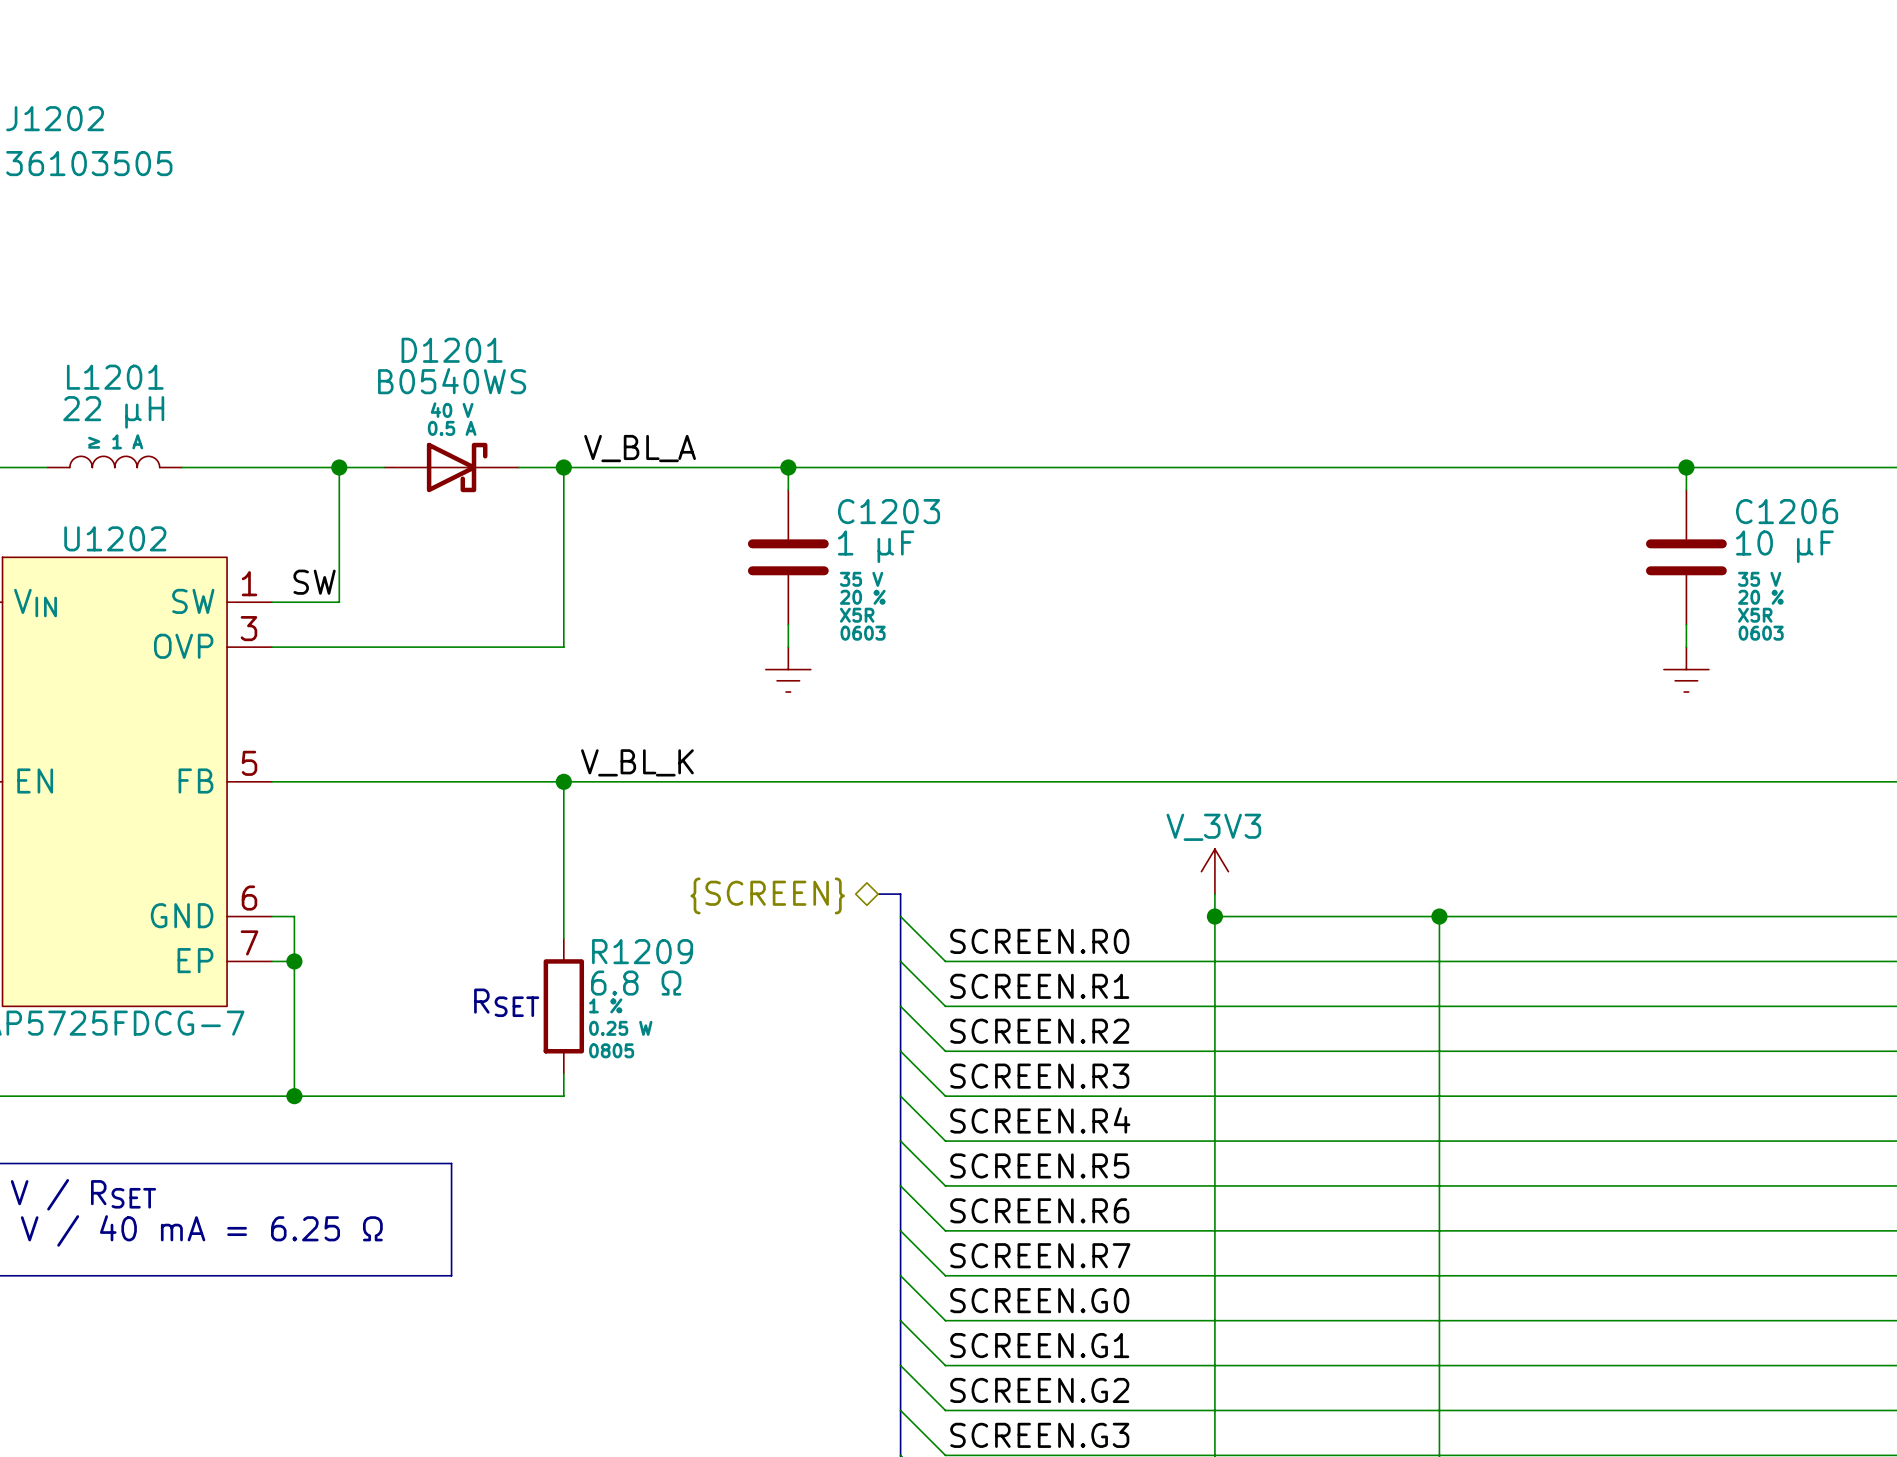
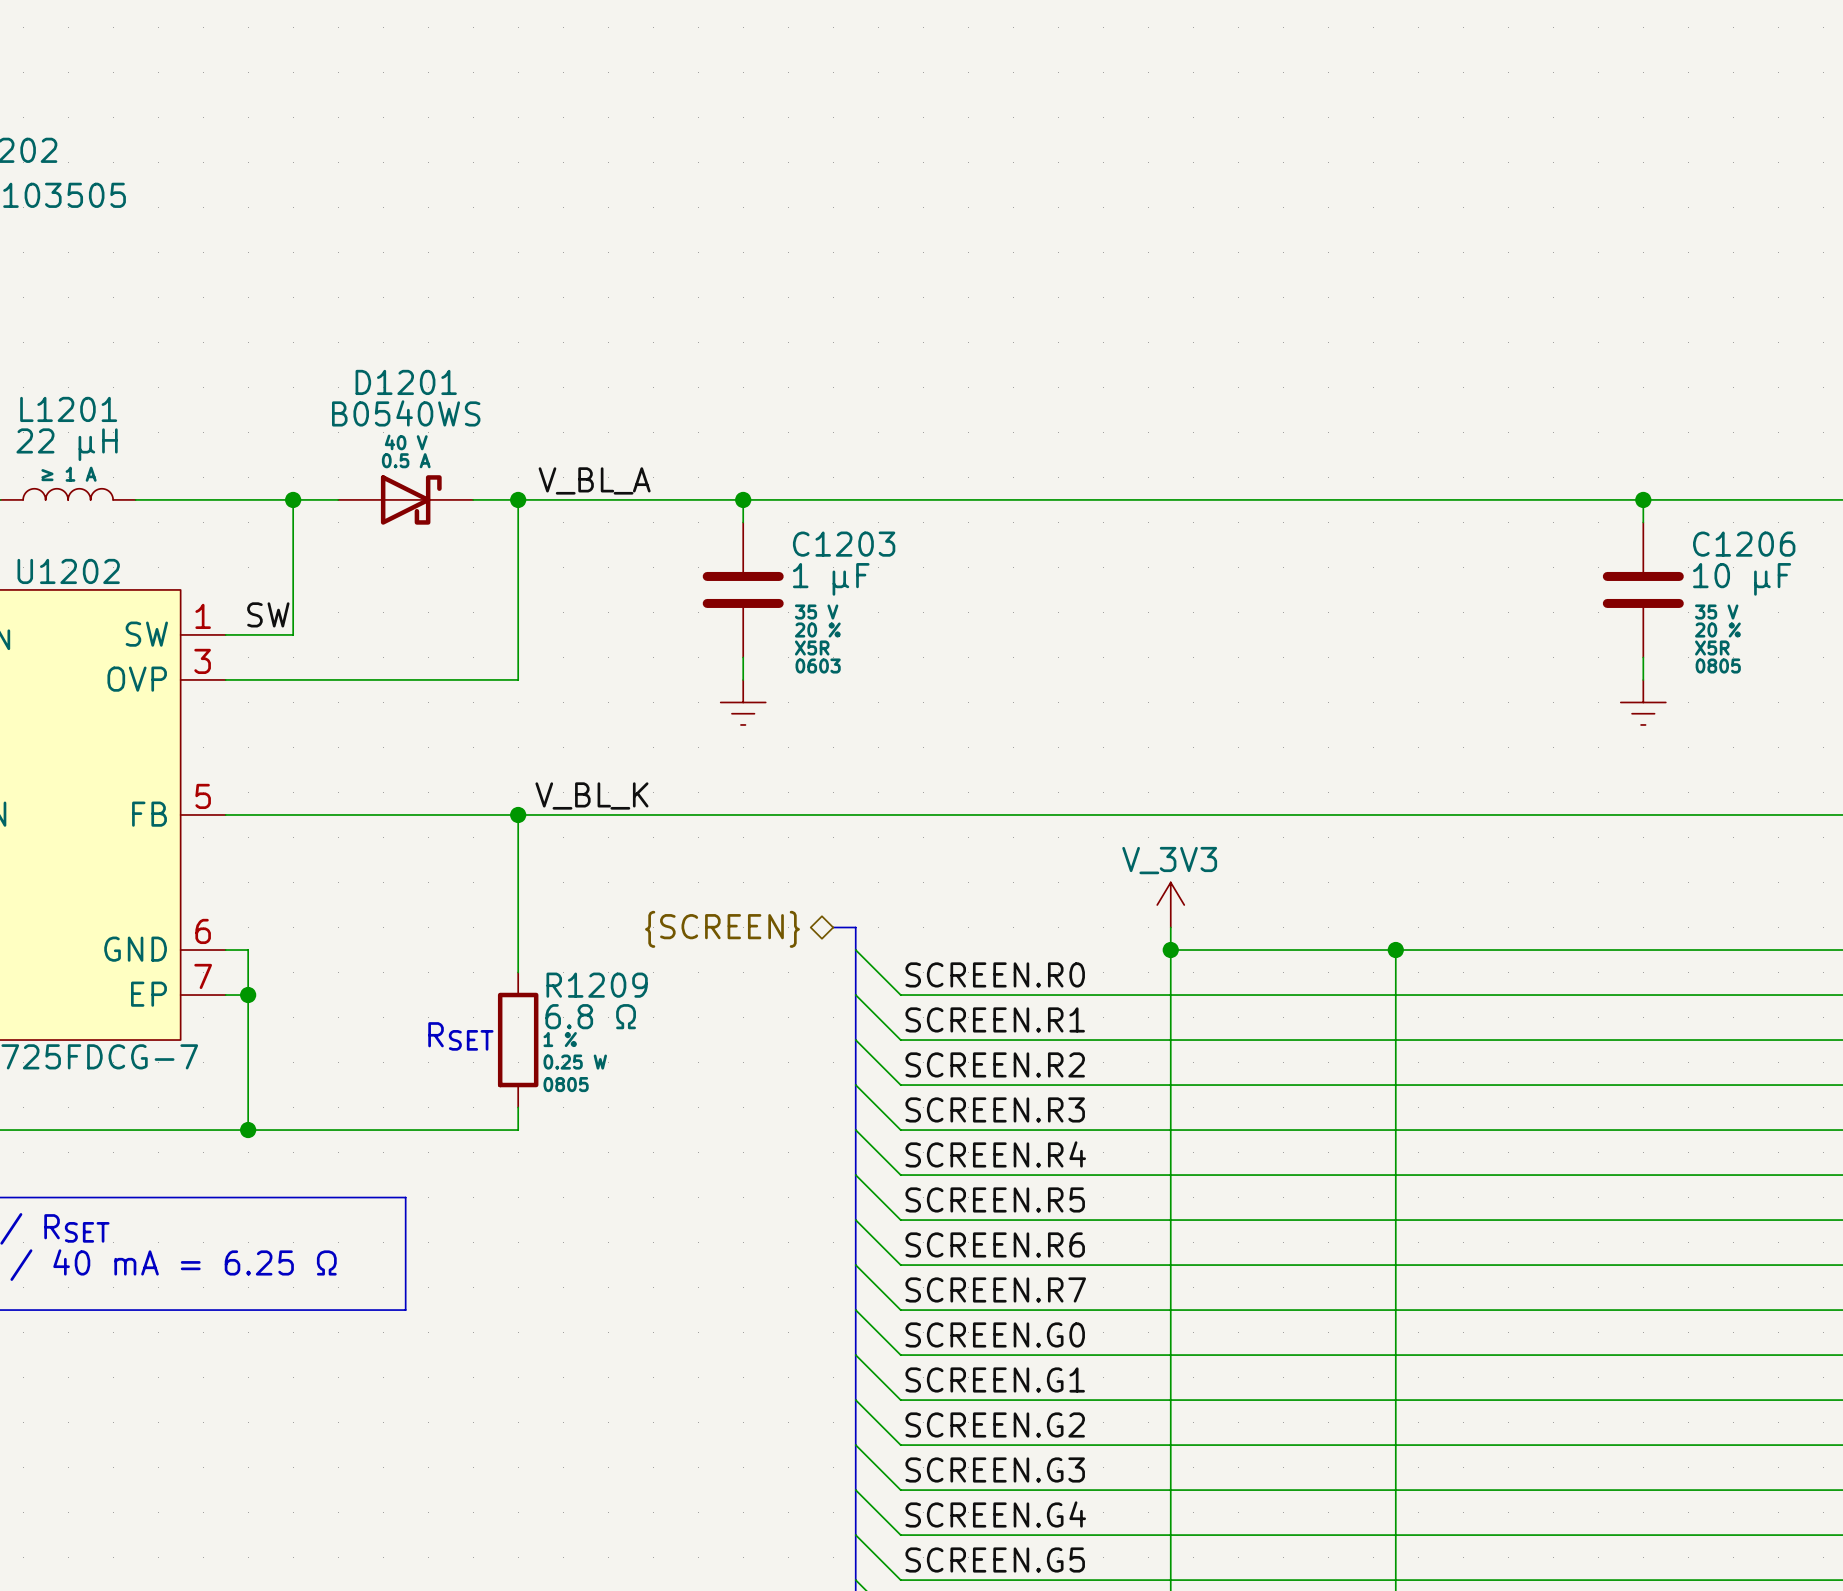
C1206 text: 0603 (1761, 633) -> 0805 (1718, 666)

